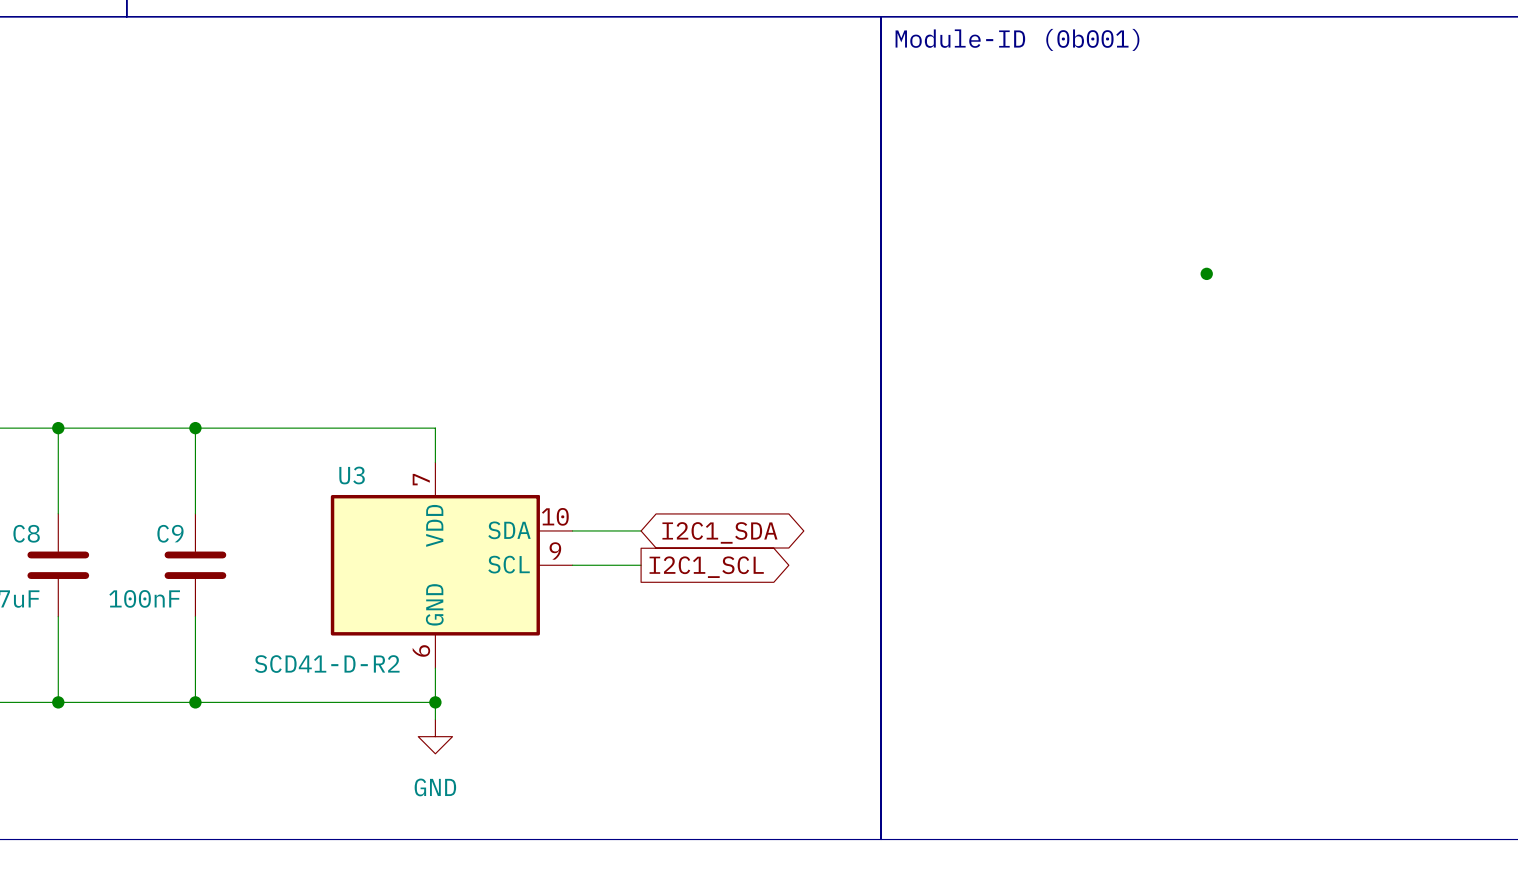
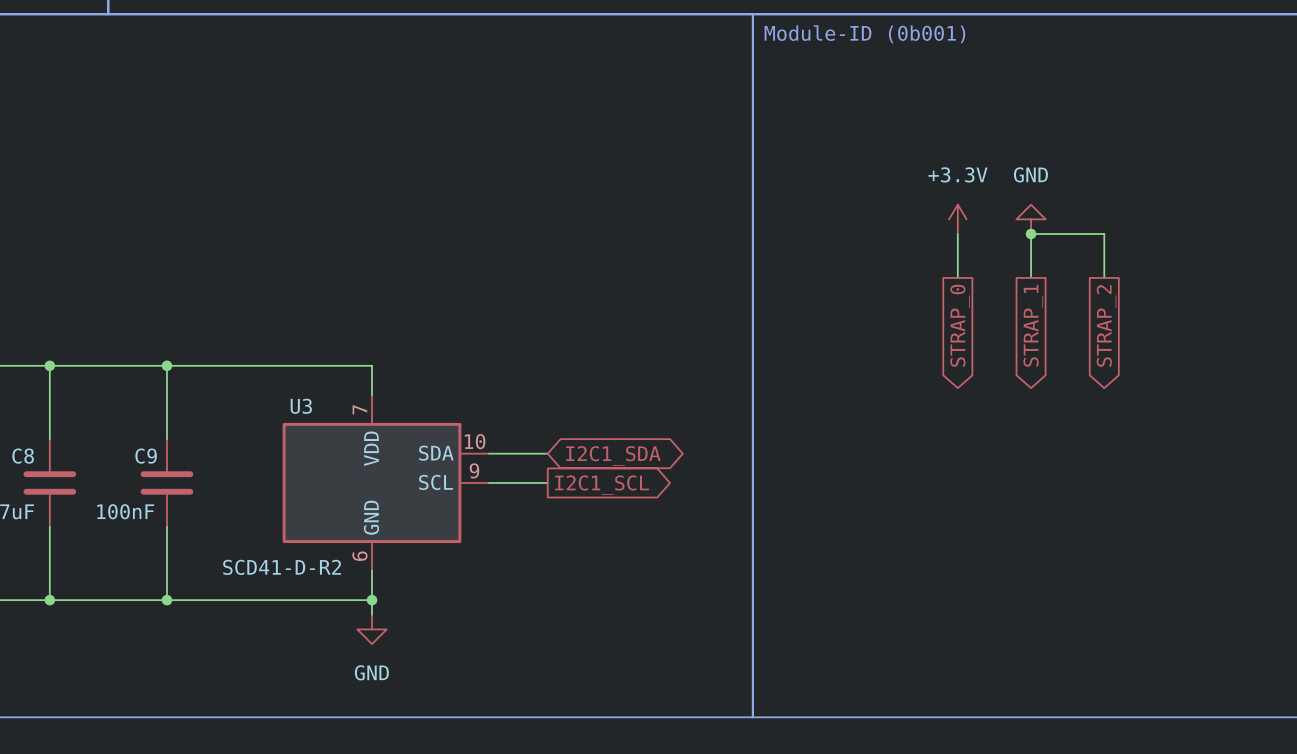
power symbol: none -> +3.3V (957, 219)
power symbol: none -> GND (1031, 219)
wire: none -> (957, 234) (957, 277)
wire: none -> (1031, 277) (1031, 234) (1104, 234) (1104, 277)
global label: none -> STRAP_0 (960, 325)
global label: none -> STRAP_1 (1033, 325)
global label: none -> STRAP_2 (1106, 325)

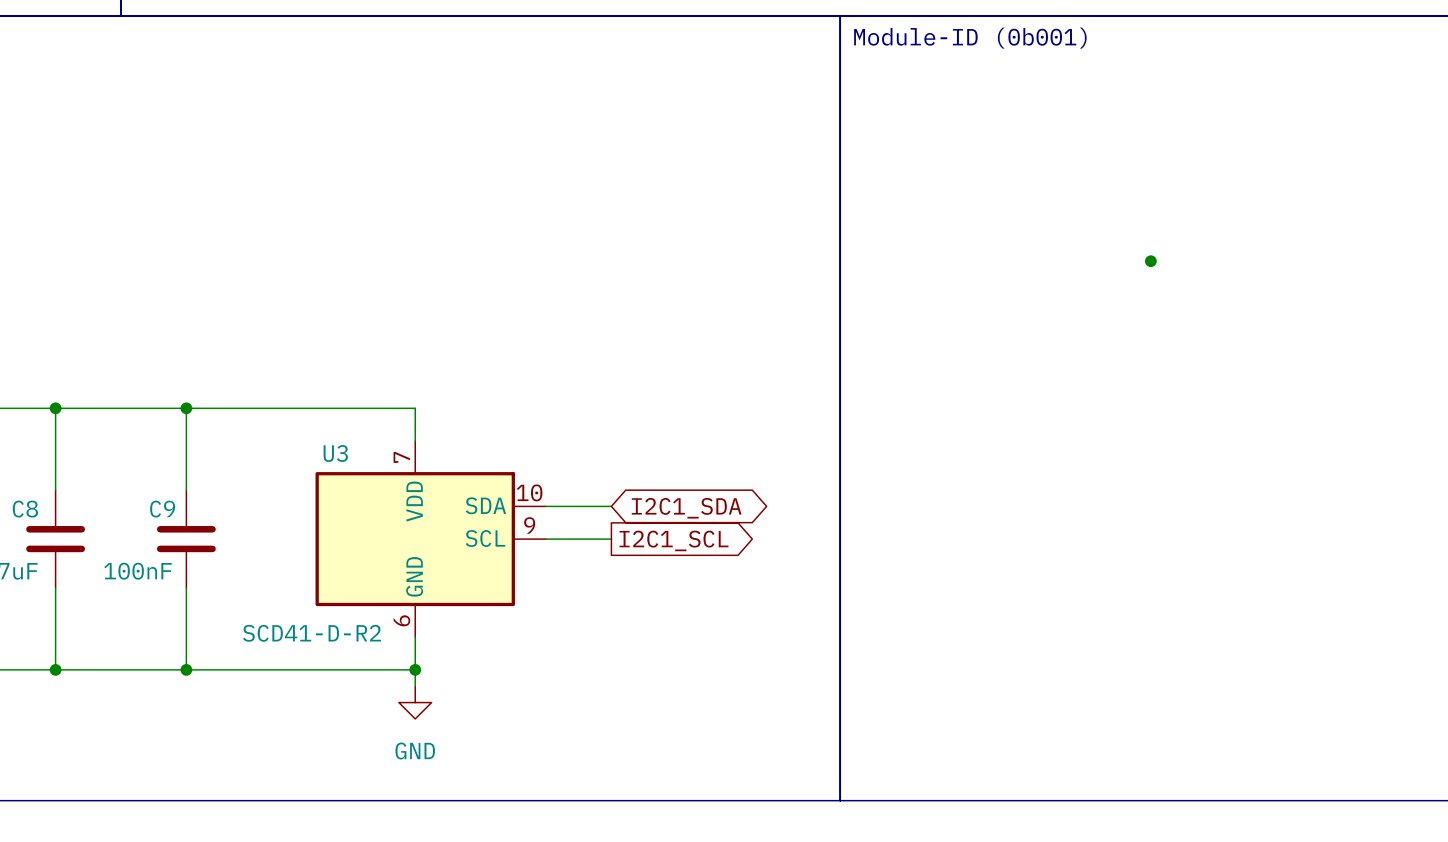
power symbol: +3.3V (957, 219) -> none
power symbol: GND (1031, 219) -> none
wire: (957, 234) (957, 277) -> none
wire: (1031, 277) (1031, 234) (1104, 234) (1104, 277) -> none
global label: STRAP_0 (960, 325) -> none
global label: STRAP_1 (1033, 325) -> none
global label: STRAP_2 (1106, 325) -> none

